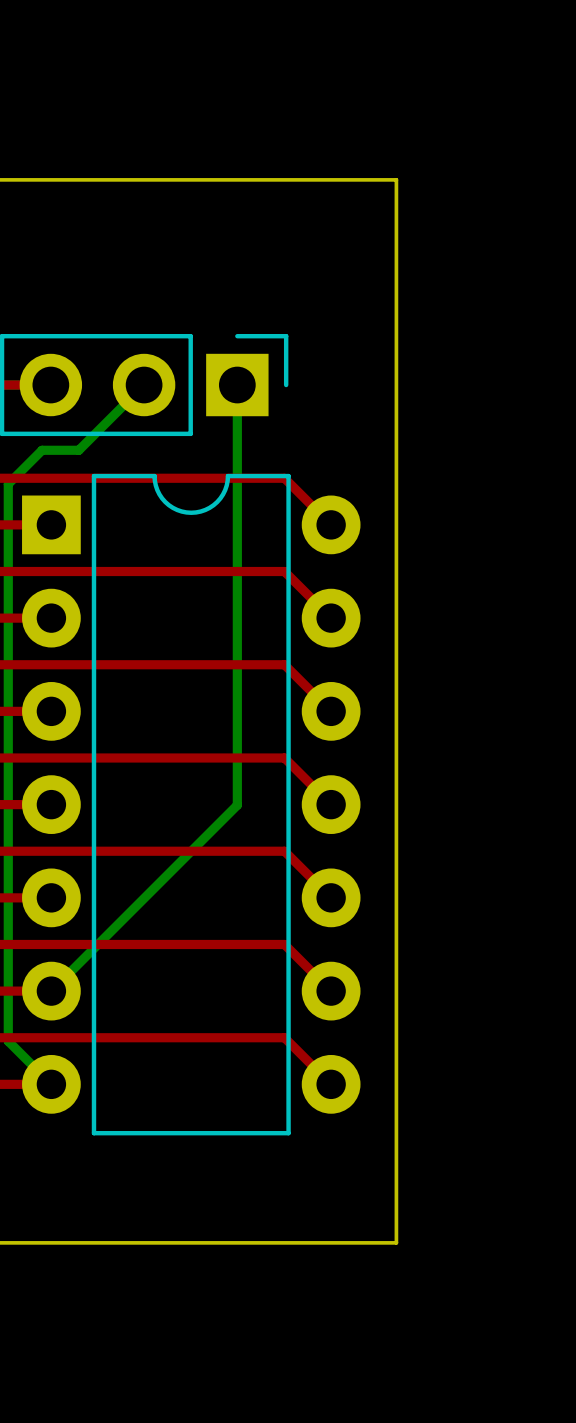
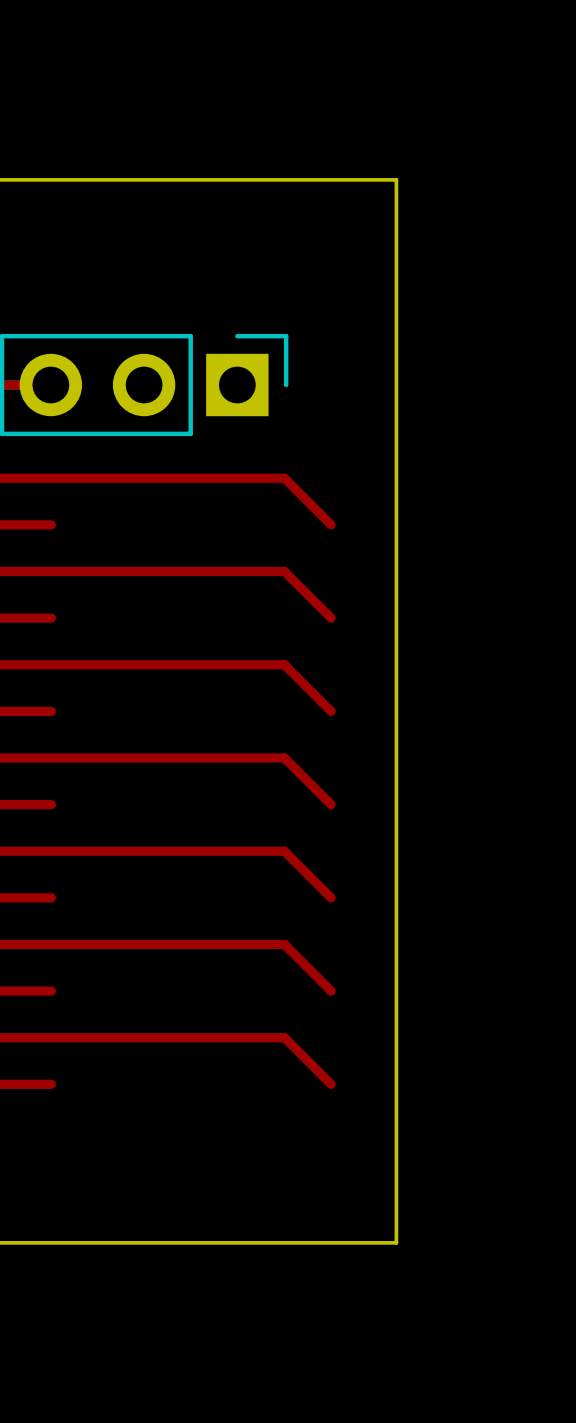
bottom track: (144, 385) (78, 450) (42, 450) (8, 484) (8, 1041) (51, 1084) -> none
bottom track: (237, 385) (237, 805) (51, 991) -> none
part: (191, 804) -> none

